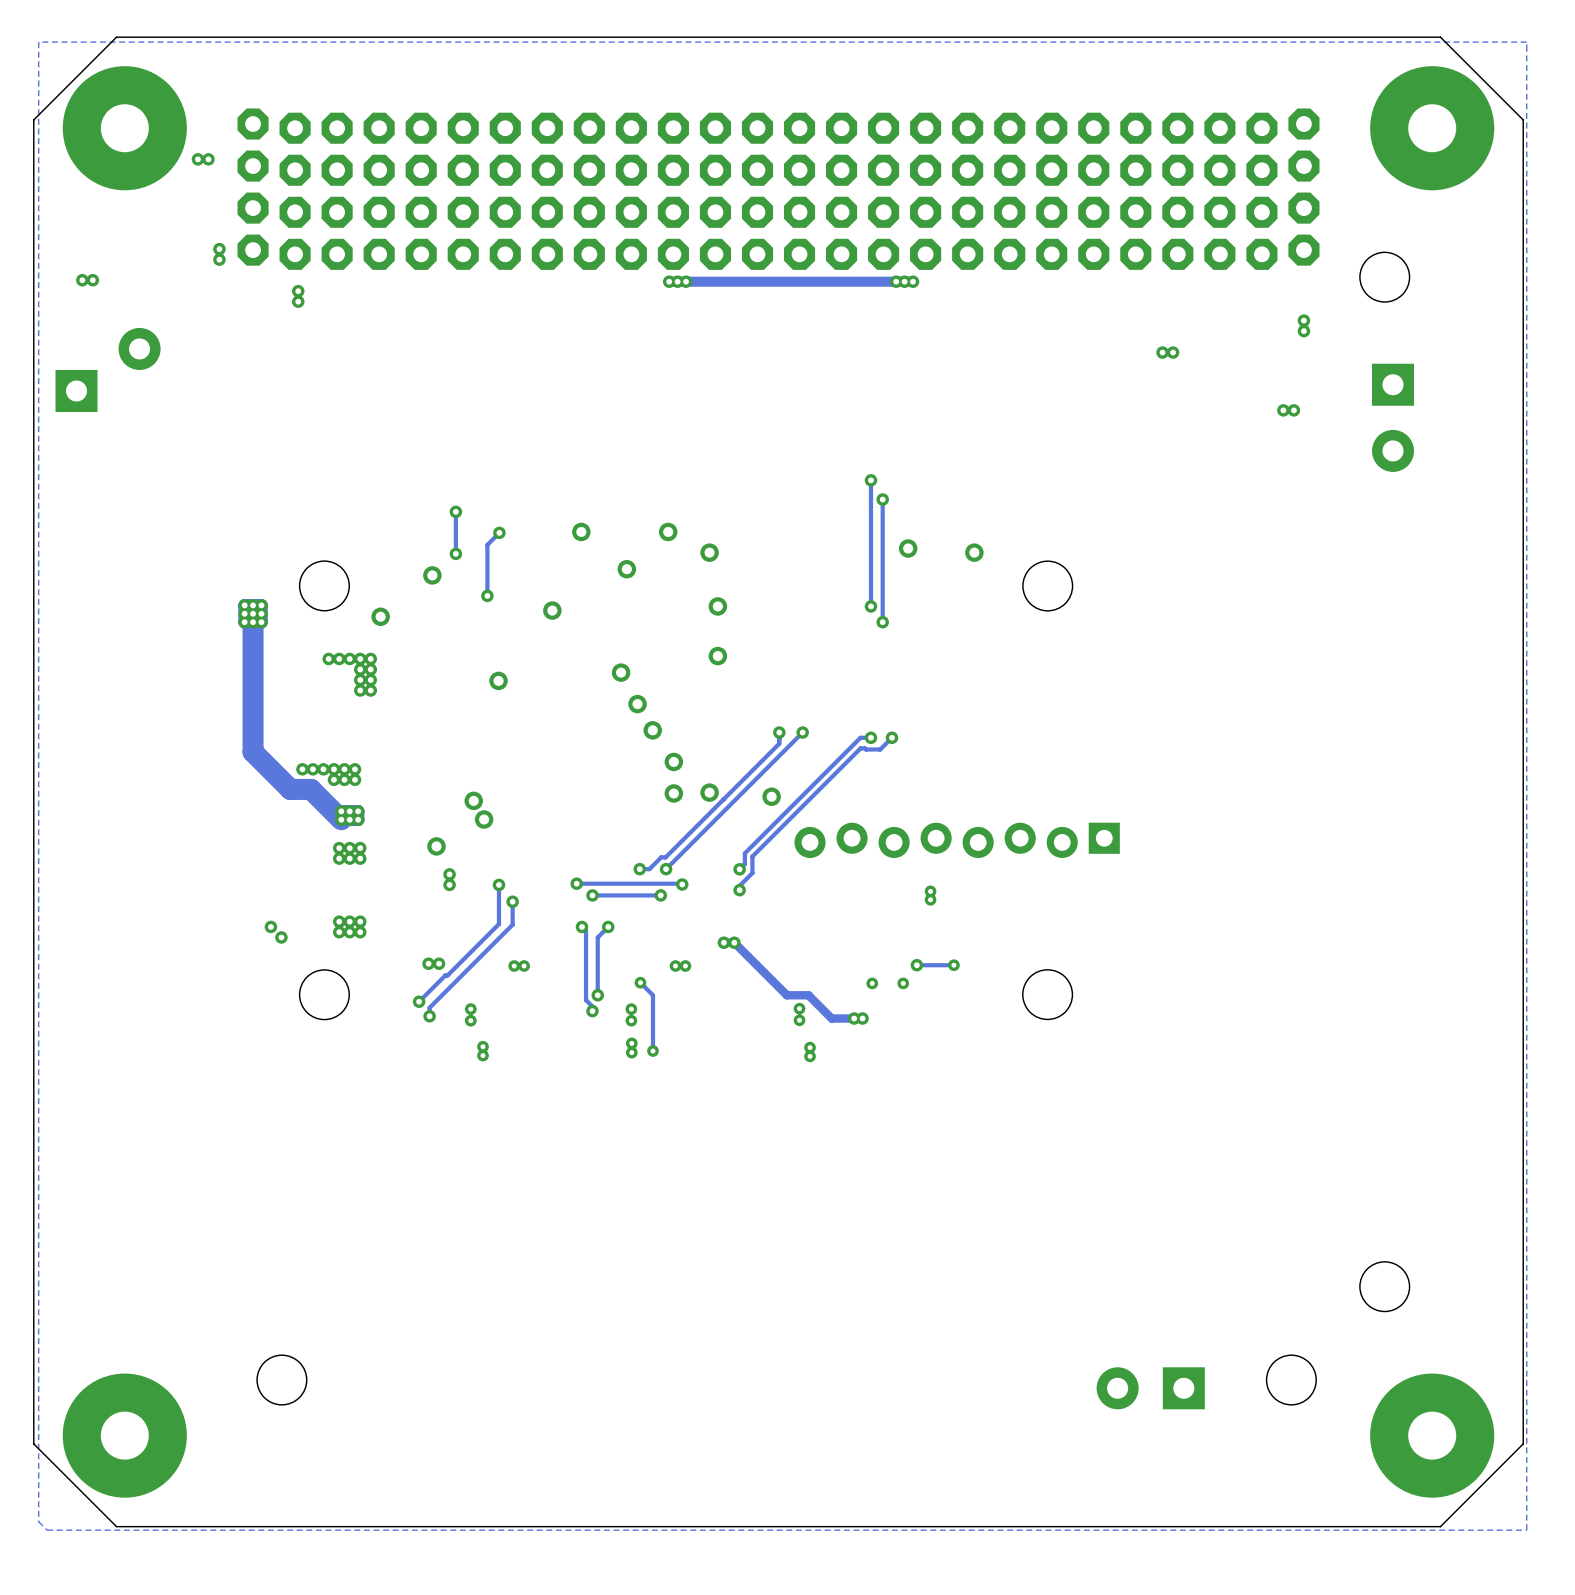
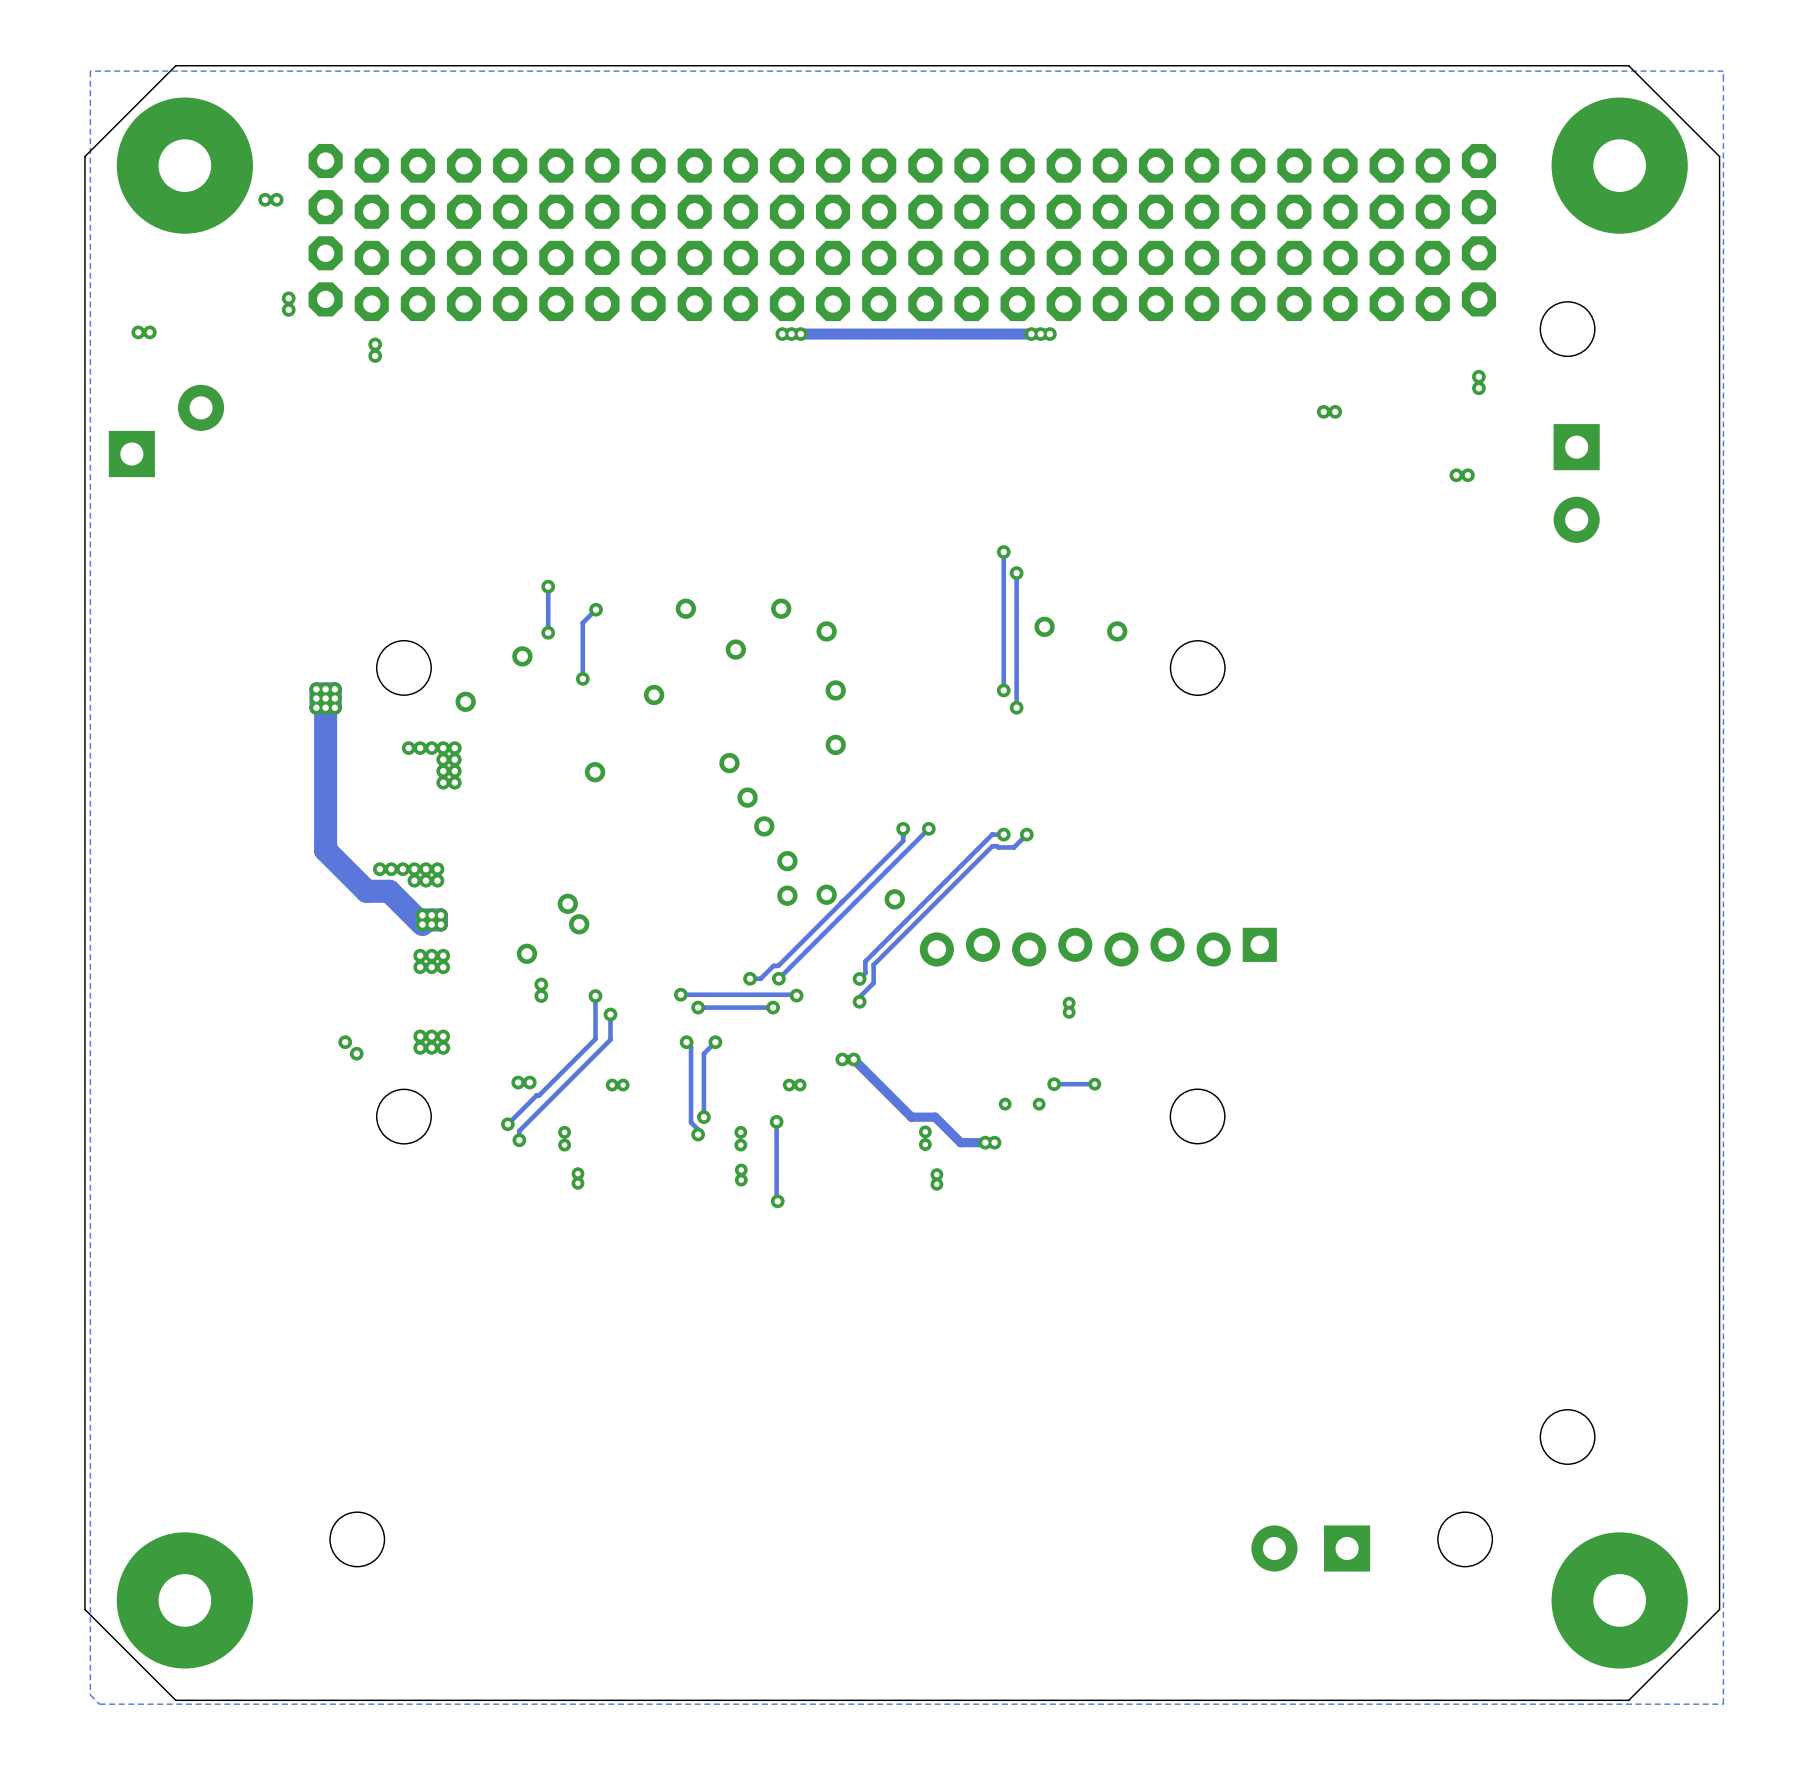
track: (640, 982) (652, 995) (652, 1051) -> none
via: (640, 982) -> none
track: none -> (776, 1121) (777, 1201)
via: none -> (776, 1121)
via: (652, 1051) -> none
via: none -> (777, 1201)

